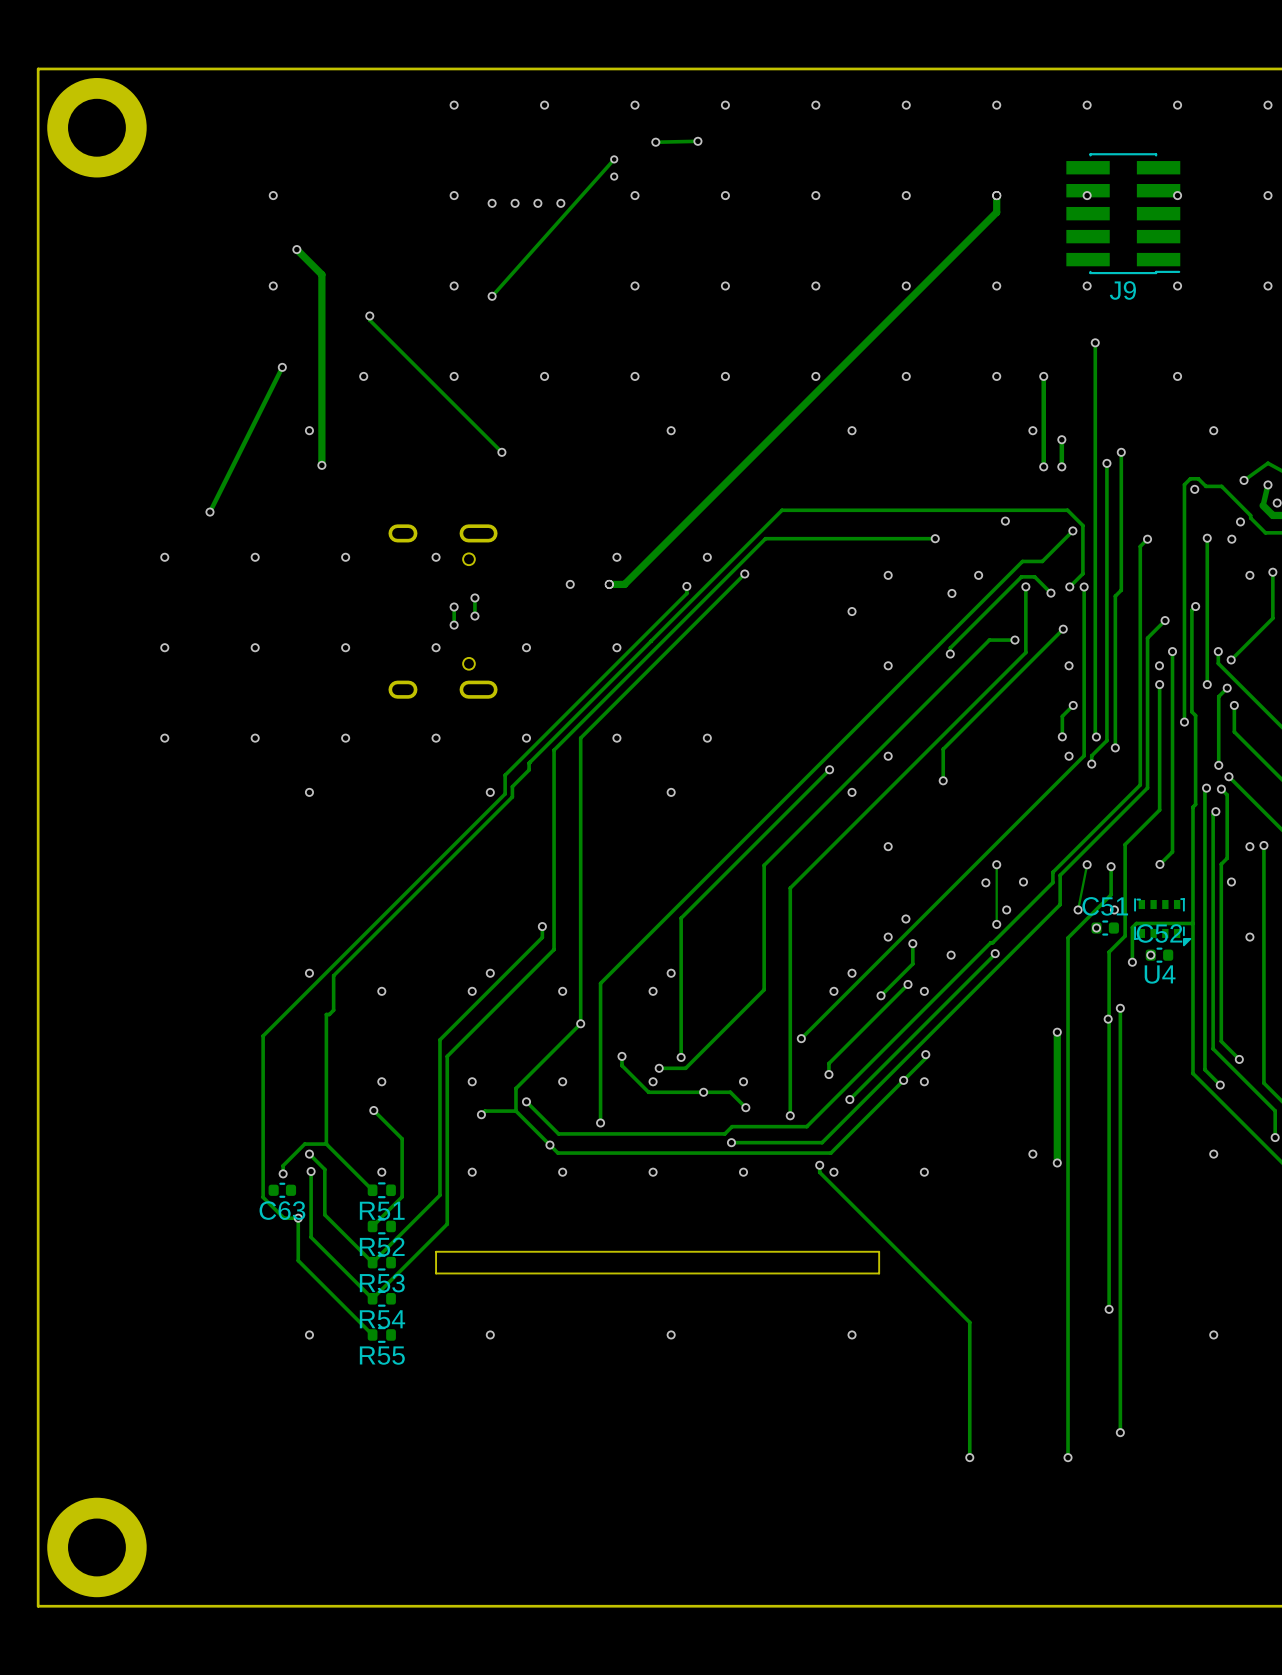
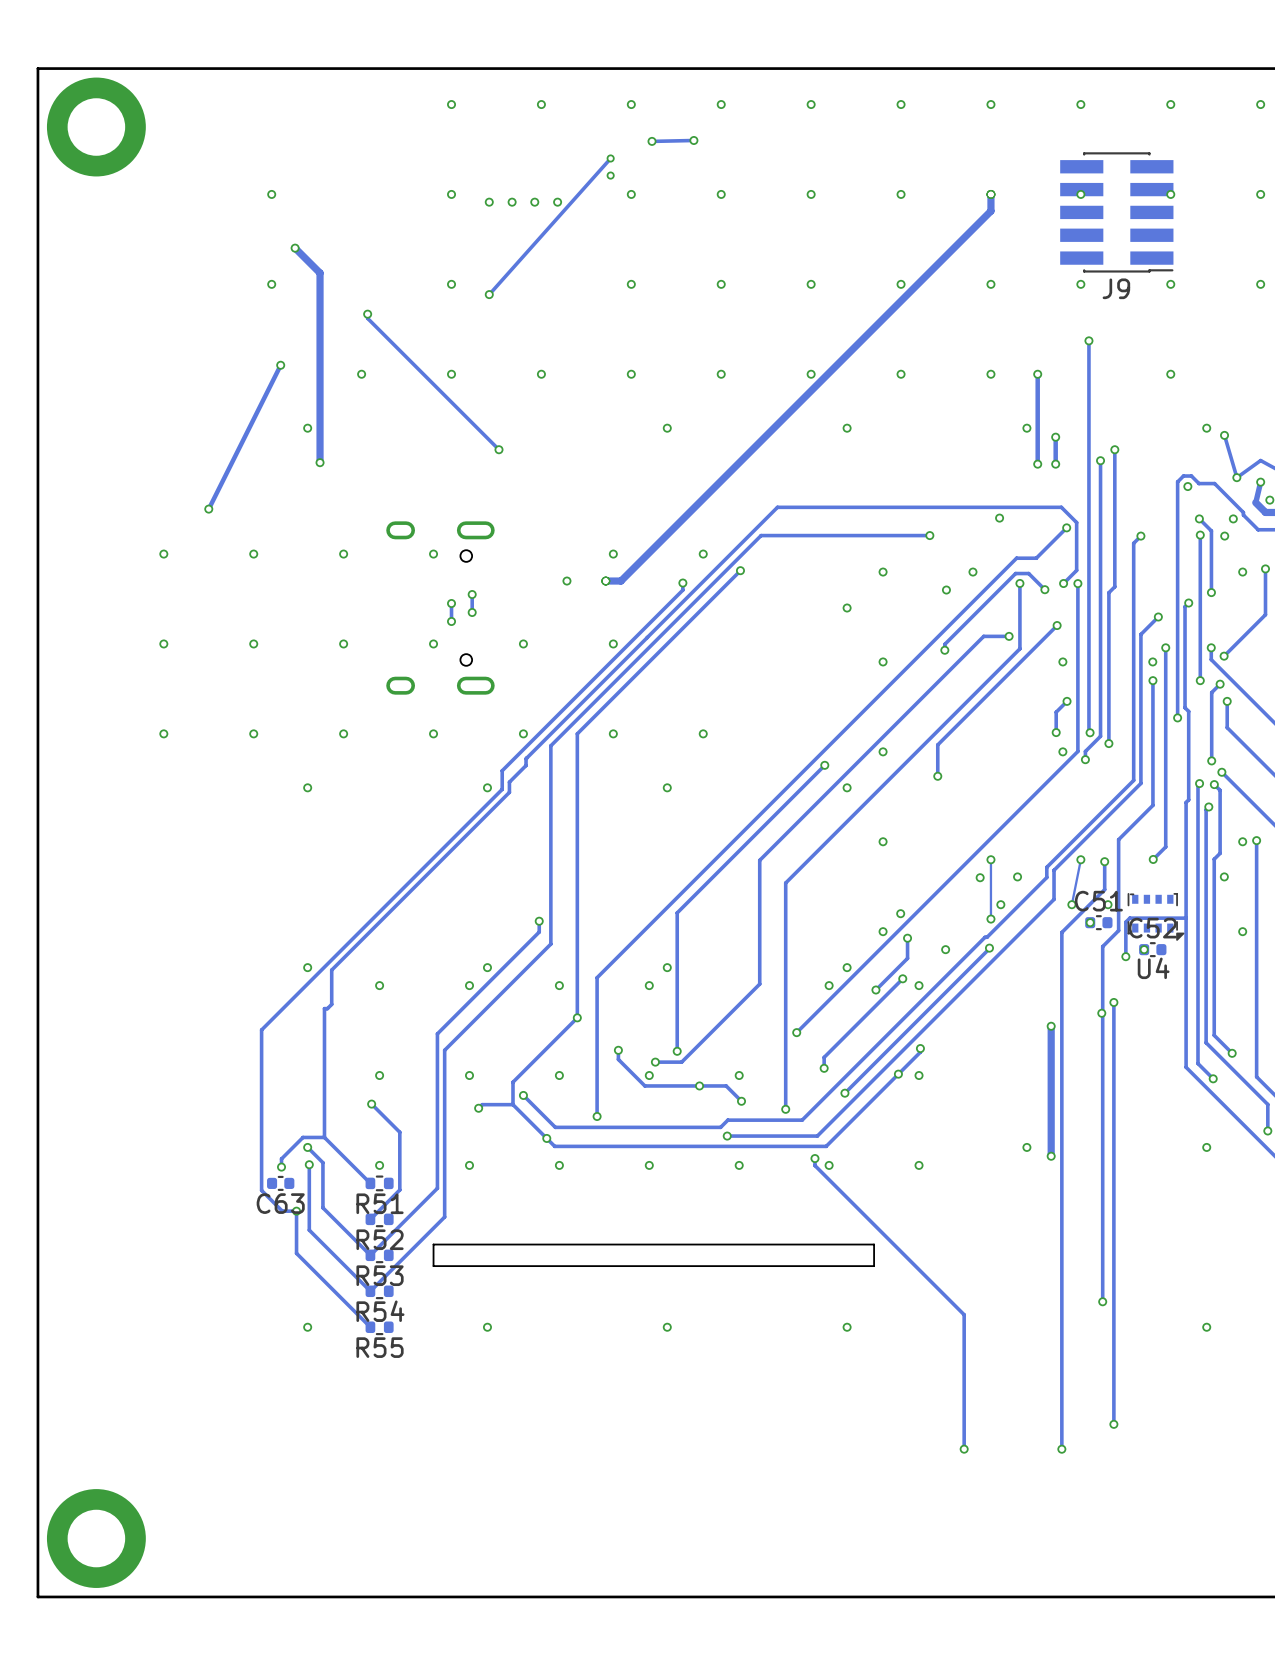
track: none -> (1224, 435) (1236, 477)
via: none -> (1224, 435)
track: none -> (1199, 518) (1211, 530) (1211, 592)
via: none -> (1199, 518)
via: none -> (1211, 592)

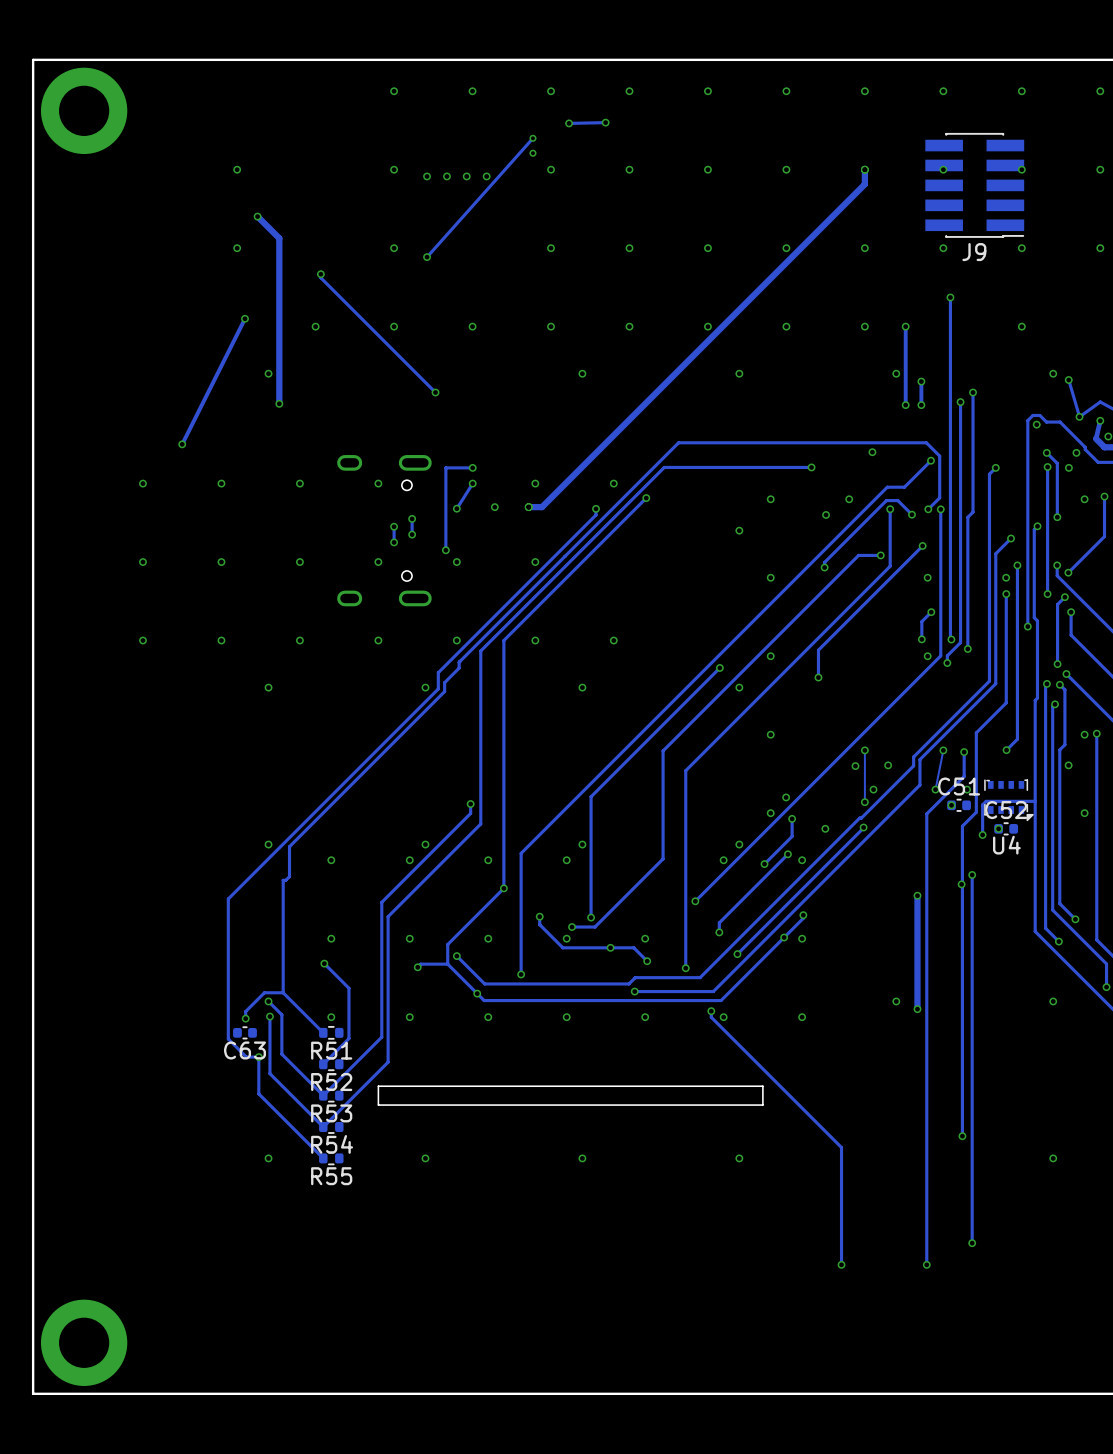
track: none -> (472, 467) (445, 467) (445, 550)
via: none -> (472, 467)
track: none -> (472, 483) (456, 508)
via: none -> (472, 483)
via: none -> (456, 508)
via: none -> (445, 550)

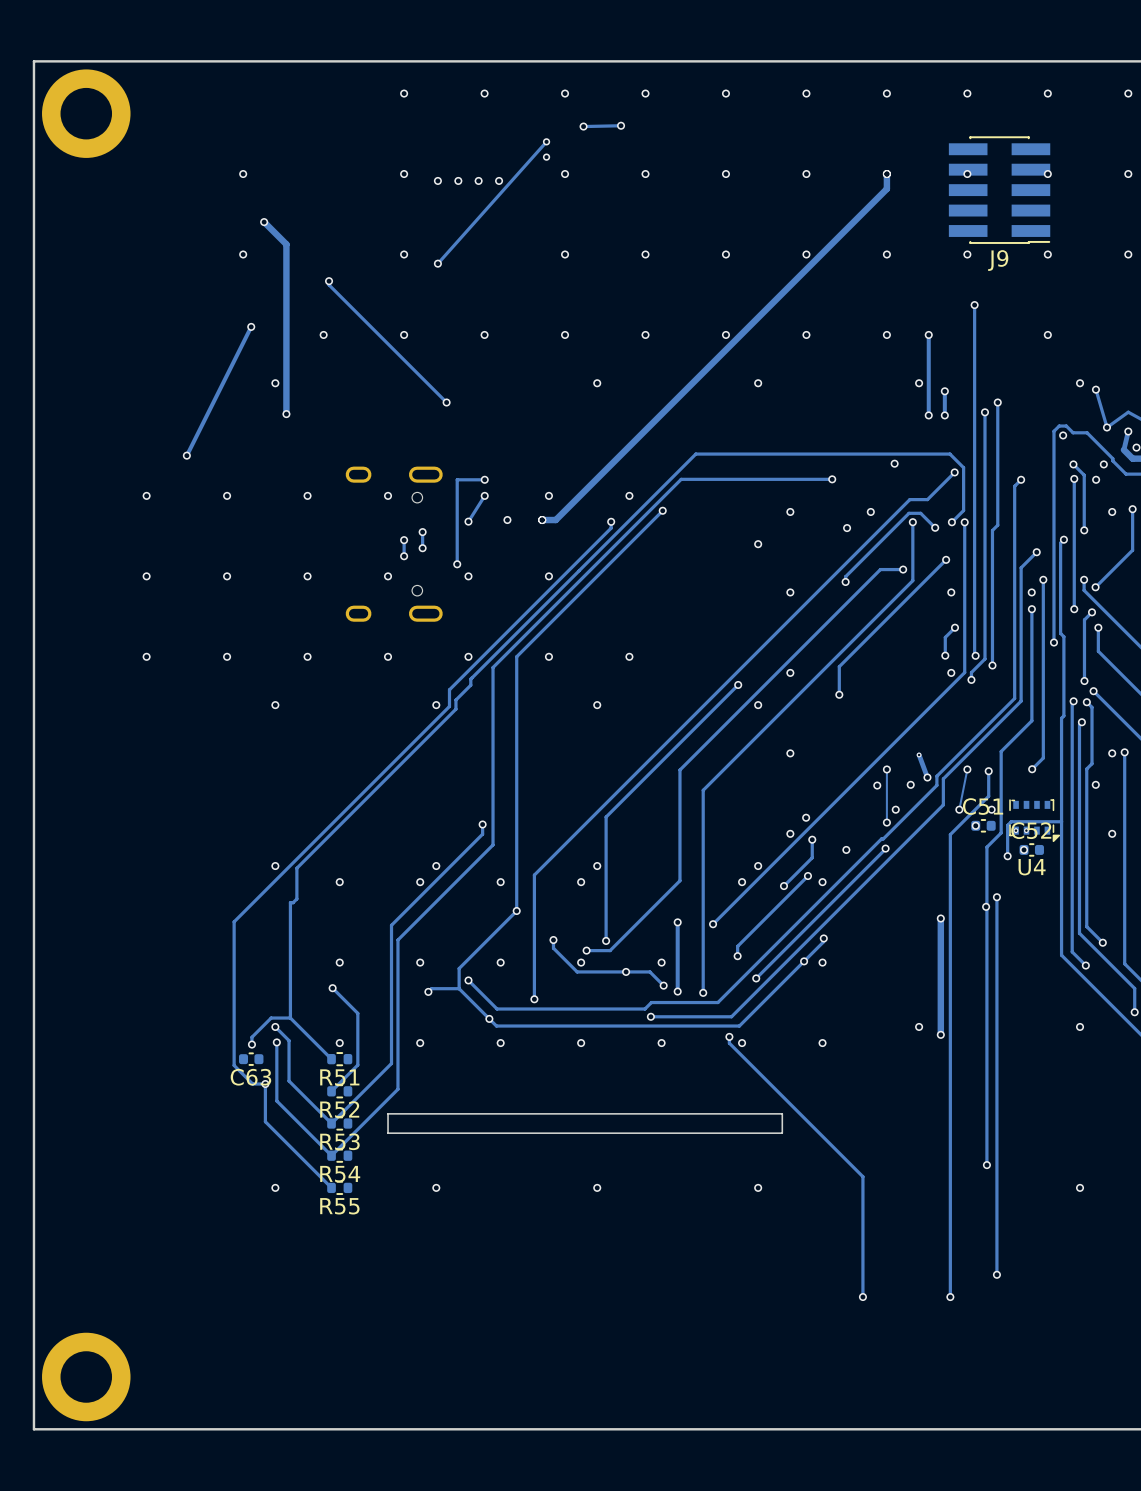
track: none -> (919, 754) (927, 777)
via: none -> (919, 754)
via: none -> (927, 777)
via: none -> (1015, 830)
via: none -> (1026, 830)
track: none -> (677, 922) (677, 991)
via: none -> (677, 922)
via: none -> (677, 991)

